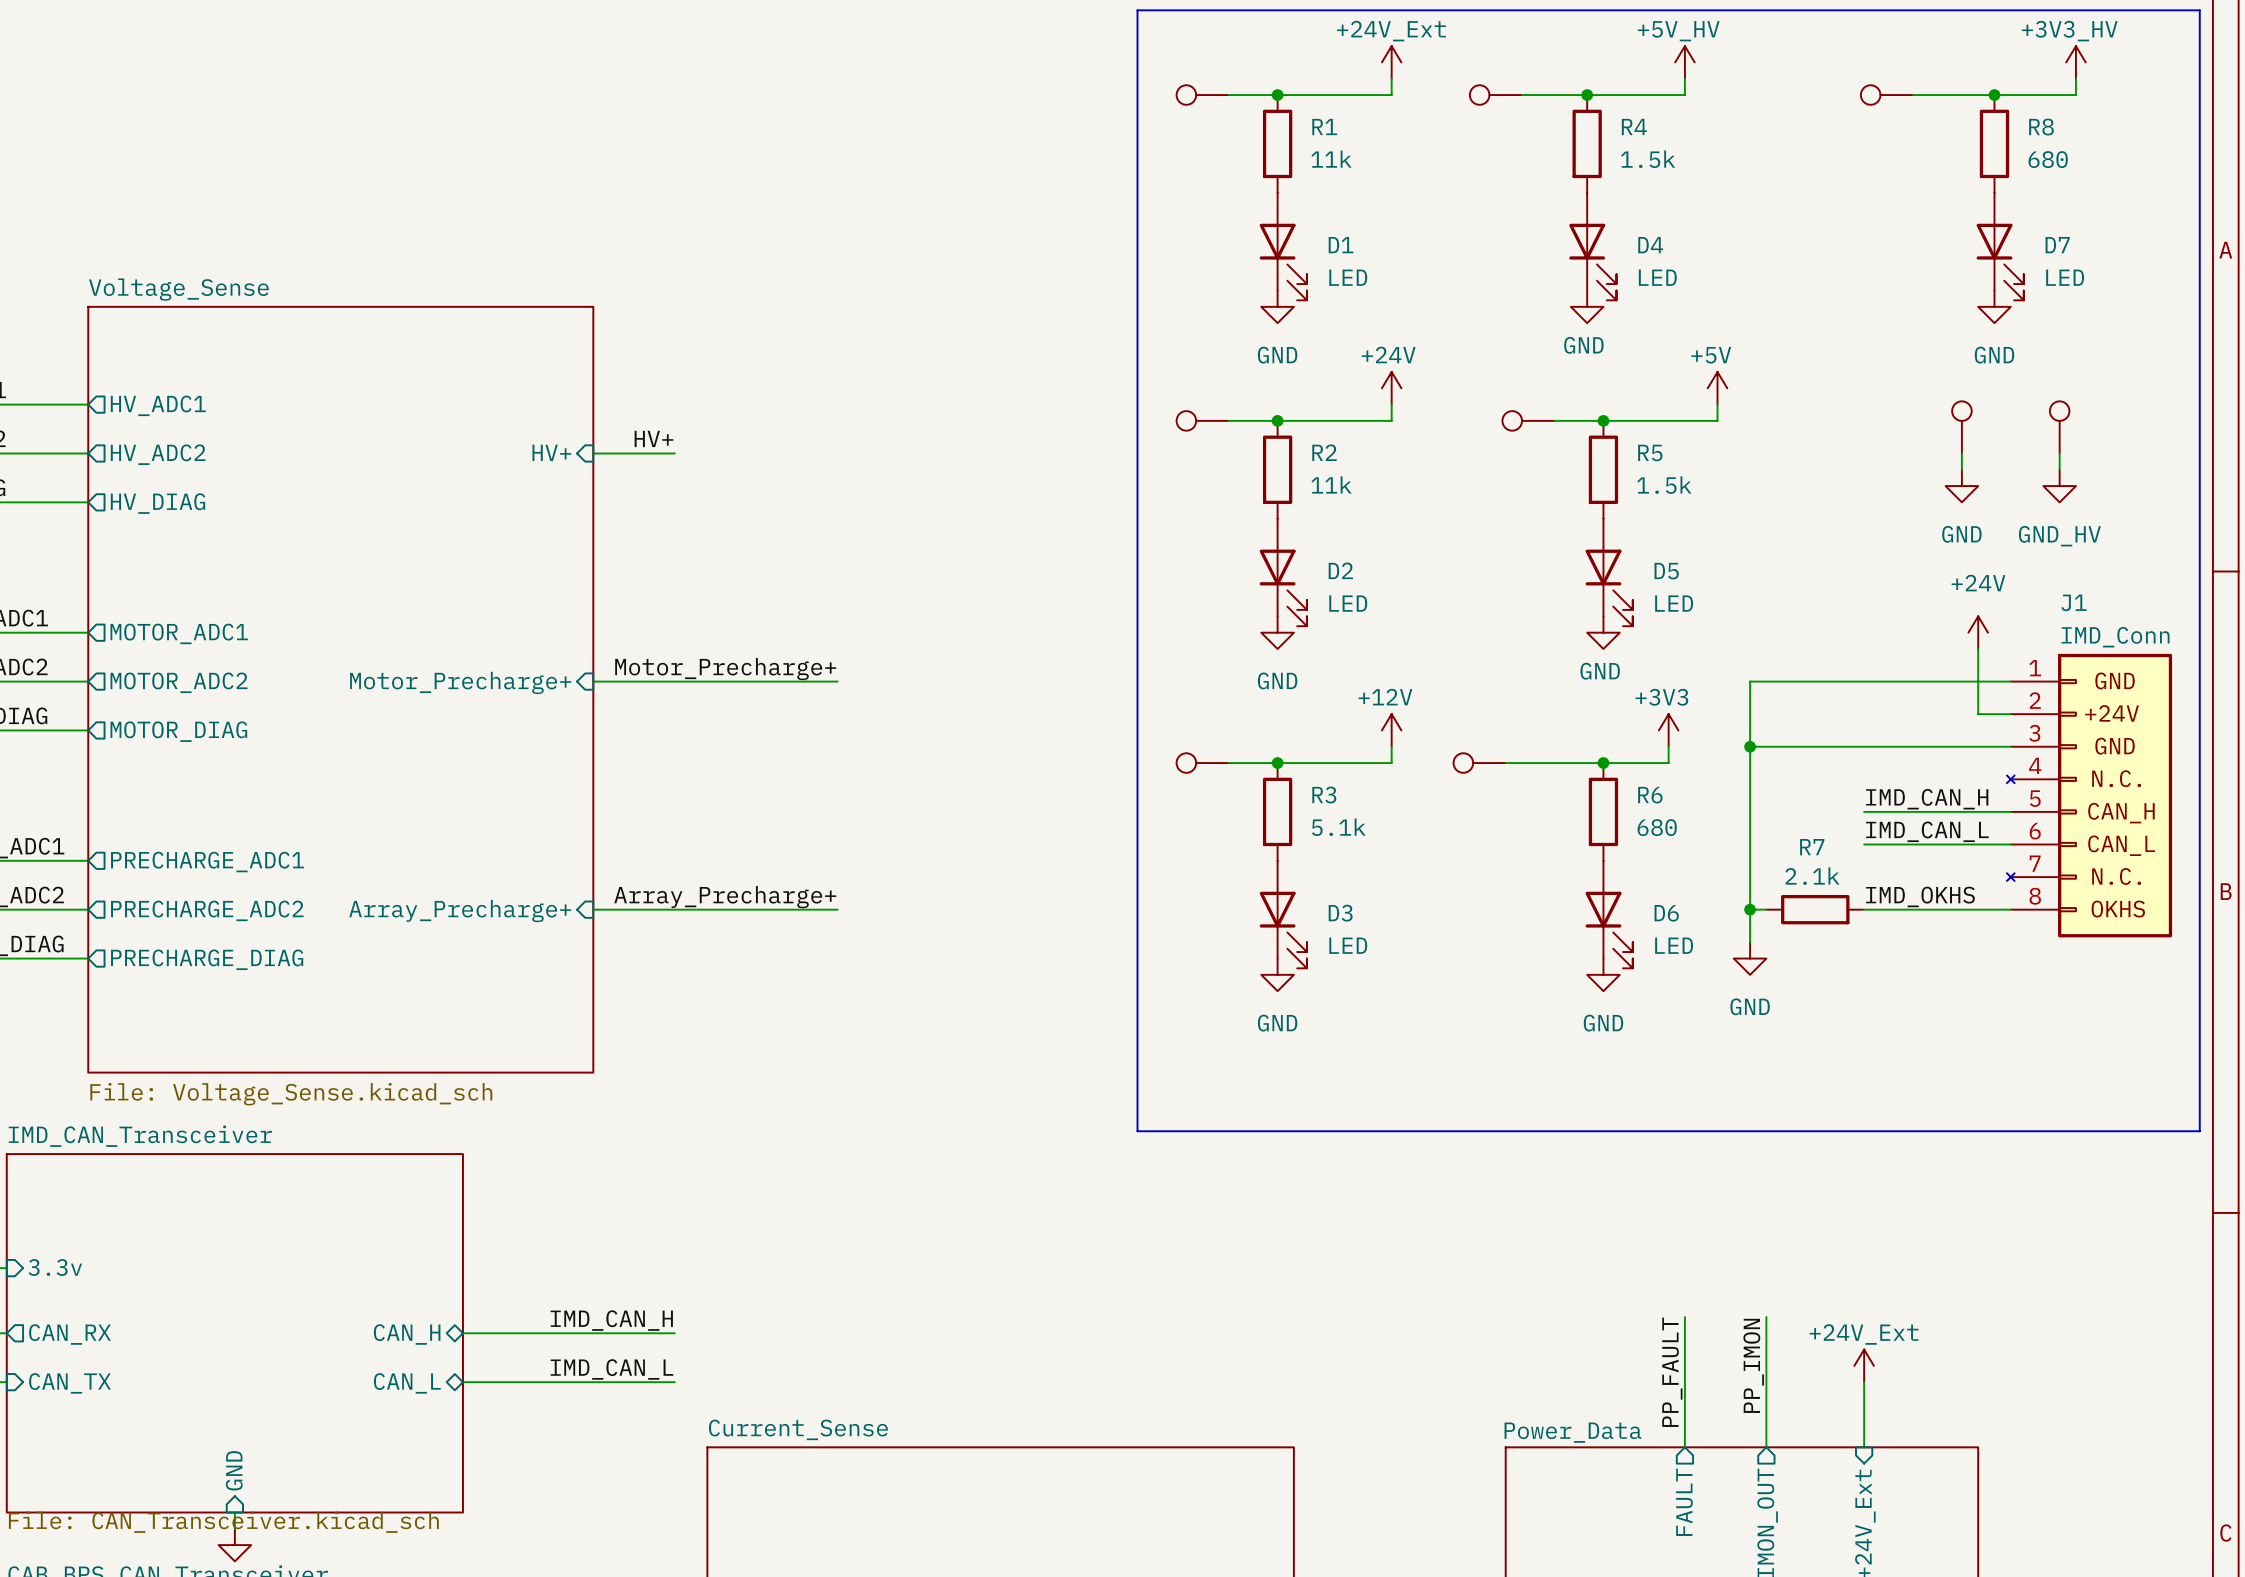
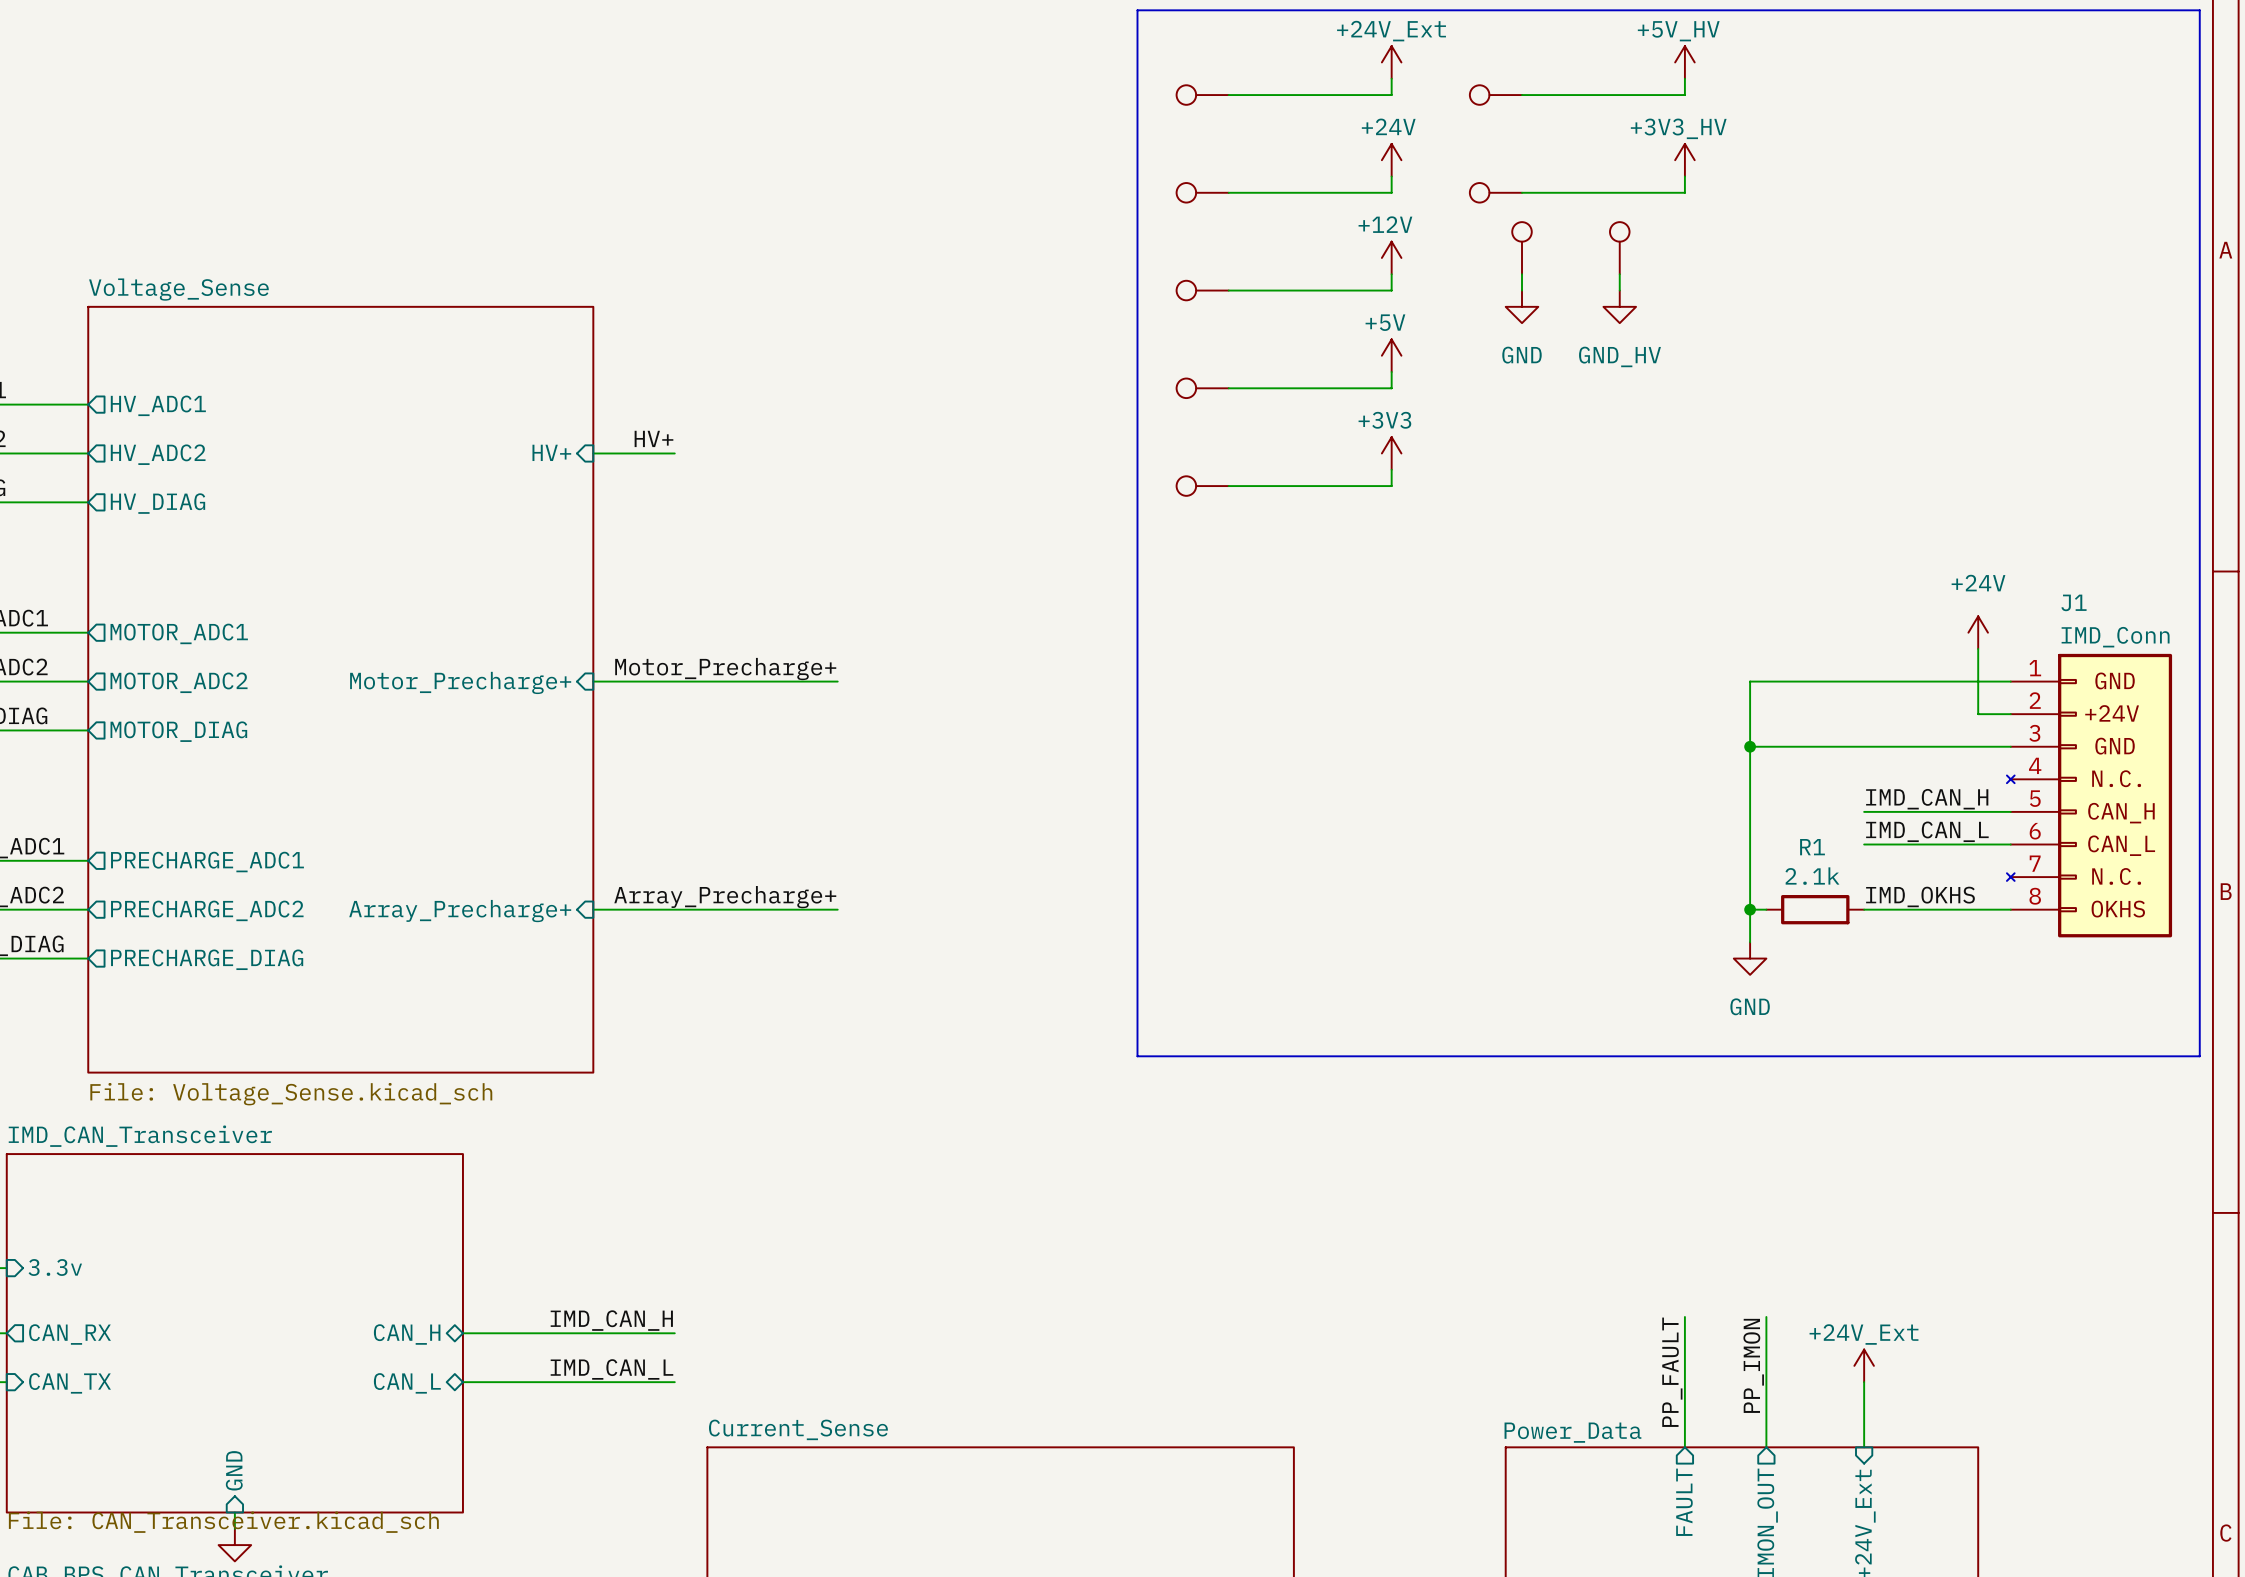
power symbol: +3V3_HV (2075, 62) -> none
wire: (2075, 78) (2075, 95) (1913, 95) -> none
junction: (1277, 95) -> none
junction: (1587, 95) -> none
part: (1886, 95) -> none
junction: (1994, 95) -> none
R1: 11k (1277, 143) -> none
R4: 1.5k (1587, 143) -> none
R8: 680 (1994, 143) -> none
power symbol: none -> +3V3_HV (1684, 160)
wire: none -> (1391, 176) (1391, 192) (1228, 192)
part: none -> (1202, 192)
part: none -> (1495, 192)
D1: LED (1283, 246) -> none
D4: LED (1592, 246) -> none
D7: LED (2000, 246) -> none
part: none -> (1522, 248)
part: none -> (1619, 248)
power symbol: none -> +12V (1391, 257)
wire: none -> (1391, 274) (1391, 290) (1228, 290)
wire: none -> (1522, 274) (1522, 290)
wire: none -> (1619, 274) (1619, 290)
part: none -> (1202, 290)
power symbol: GND (1277, 306) -> none
power symbol position: GND (1587, 306) -> GND (1522, 306)
power symbol: none -> GND_HV (1619, 306)
power symbol: GND (1994, 306) -> none
power symbol text position: GND (1583, 345) -> GND (1522, 355)
power symbol: none -> +5V (1391, 355)
part: none -> (1202, 388)
power symbol position: +24V (1391, 388) -> +24V (1391, 160)
power symbol: +5V (1717, 388) -> none
wire: (1391, 404) (1391, 420) (1228, 420) -> (1391, 372) (1391, 388) (1228, 388)
wire: (1717, 404) (1717, 420) (1554, 420) -> (1684, 176) (1684, 192) (1522, 192)
part: (1202, 420) -> none
junction: (1277, 420) -> none
part: (1528, 420) -> none
junction: (1603, 420) -> none
part: (1961, 427) -> none
part: (2059, 427) -> none
power symbol: none -> +3V3 (1391, 453)
wire: (1961, 453) (1961, 469) -> none
wire: (2059, 453) (2059, 469) -> none
R2: 11k (1277, 469) -> none
R5: 1.5k (1603, 469) -> none
part: none -> (1202, 486)
power symbol: GND (1961, 486) -> none
power symbol: GND_HV (2059, 486) -> none
D2: LED (1283, 572) -> none
D5: LED (1609, 572) -> none
power symbol: GND (1277, 632) -> none
power symbol: GND (1603, 632) -> none
power symbol: +12V (1391, 730) -> none
power symbol: +3V3 (1668, 730) -> none
wire: (1391, 746) (1391, 763) (1228, 763) -> (1391, 469) (1391, 486) (1228, 486)
wire: (1668, 746) (1668, 763) (1505, 763) -> none
part: (1202, 763) -> none
junction: (1277, 763) -> none
part: (1479, 763) -> none
junction: (1603, 763) -> none
R3: 5.1k (1277, 811) -> none
R6: 680 (1603, 811) -> none
R7 name: R7 (1812, 847) -> R1 (1812, 847)
D3: LED (1283, 914) -> none
D6: LED (1609, 914) -> none
power symbol: GND (1277, 974) -> none
power symbol: GND (1603, 974) -> none
line: (1137, 1056) (1137, 1131) (2199, 1131) (2199, 1056) -> (1137, 1056) (2199, 1056)

